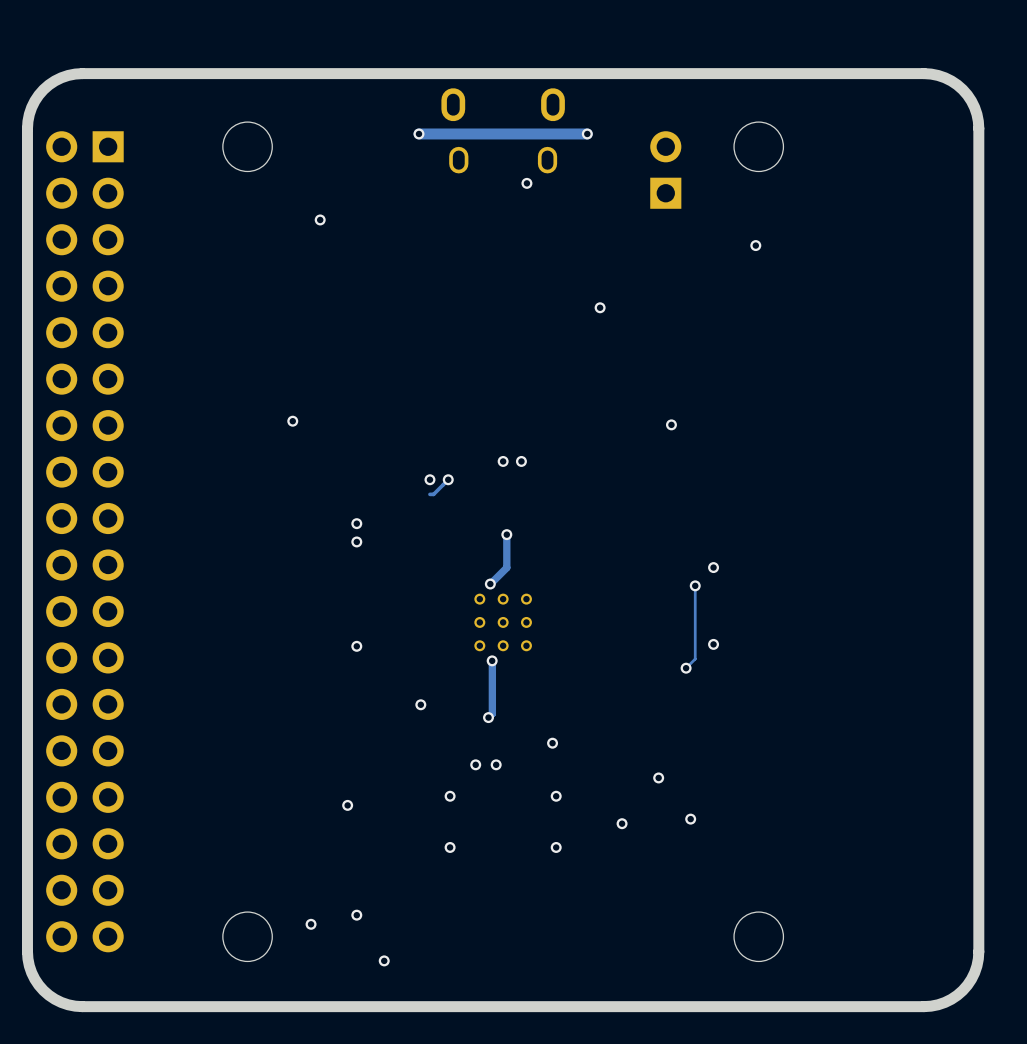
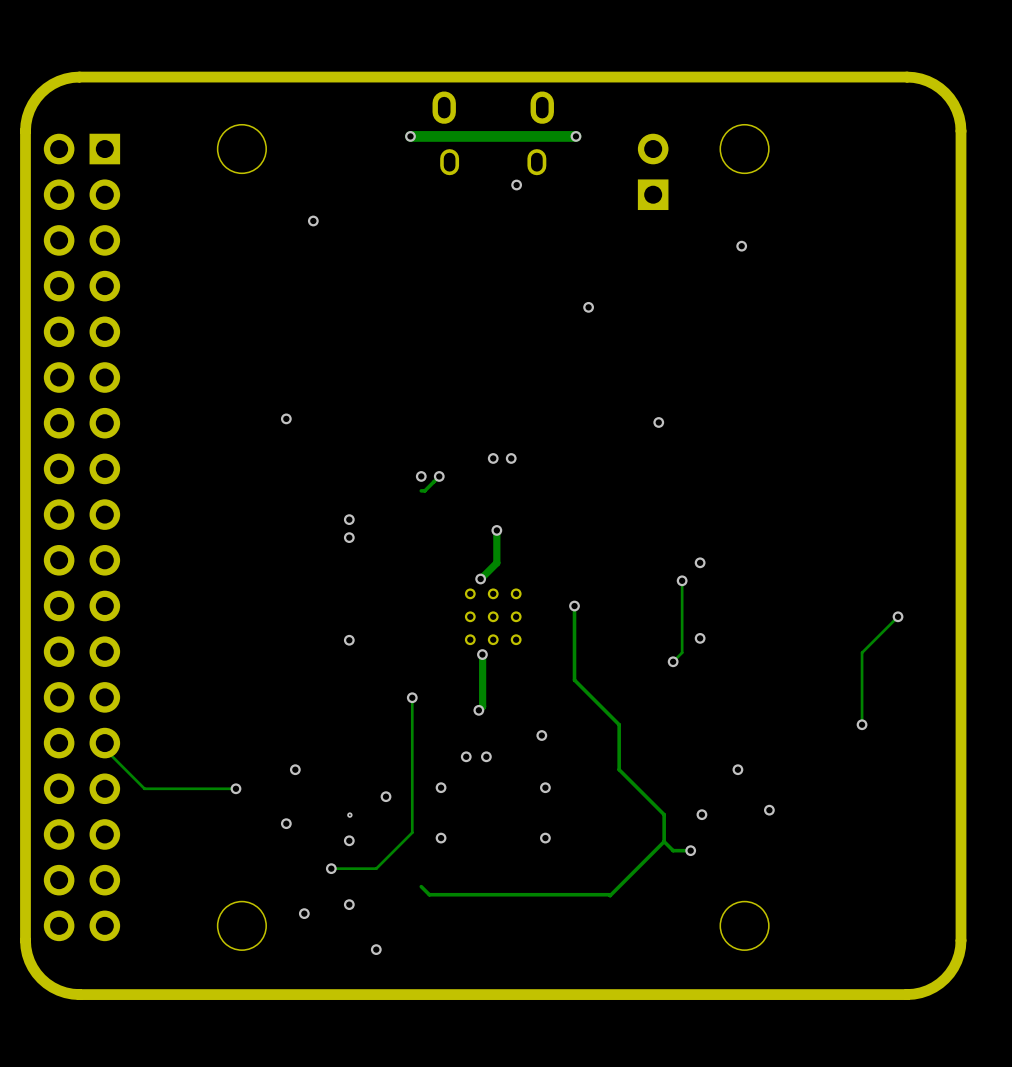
track: none -> (574, 606) (574, 680) (619, 724) (619, 769) (664, 814) (664, 841)
via: none -> (574, 606)
track: none -> (898, 616) (862, 652) (862, 724)
via: none -> (898, 616)
track: none -> (412, 697) (412, 832) (376, 868) (331, 868)
via: none -> (862, 724)
track: none -> (104, 743) (104, 749) (144, 788) (235, 788)
via: none -> (295, 769)
via: (658, 777) -> none
via: none -> (737, 769)
via: none -> (235, 788)
via: (347, 805) -> none
via: none -> (386, 796)
via: (690, 819) -> none
via: none -> (769, 810)
via: (622, 823) -> none
via: none -> (701, 814)
via: none -> (349, 815)
via: none -> (286, 823)
via: none -> (349, 840)
track: none -> (664, 841) (610, 895) (429, 894) (421, 886)
track: none -> (664, 841) (673, 850) (690, 850)
via: none -> (690, 850)
via: none -> (331, 868)

